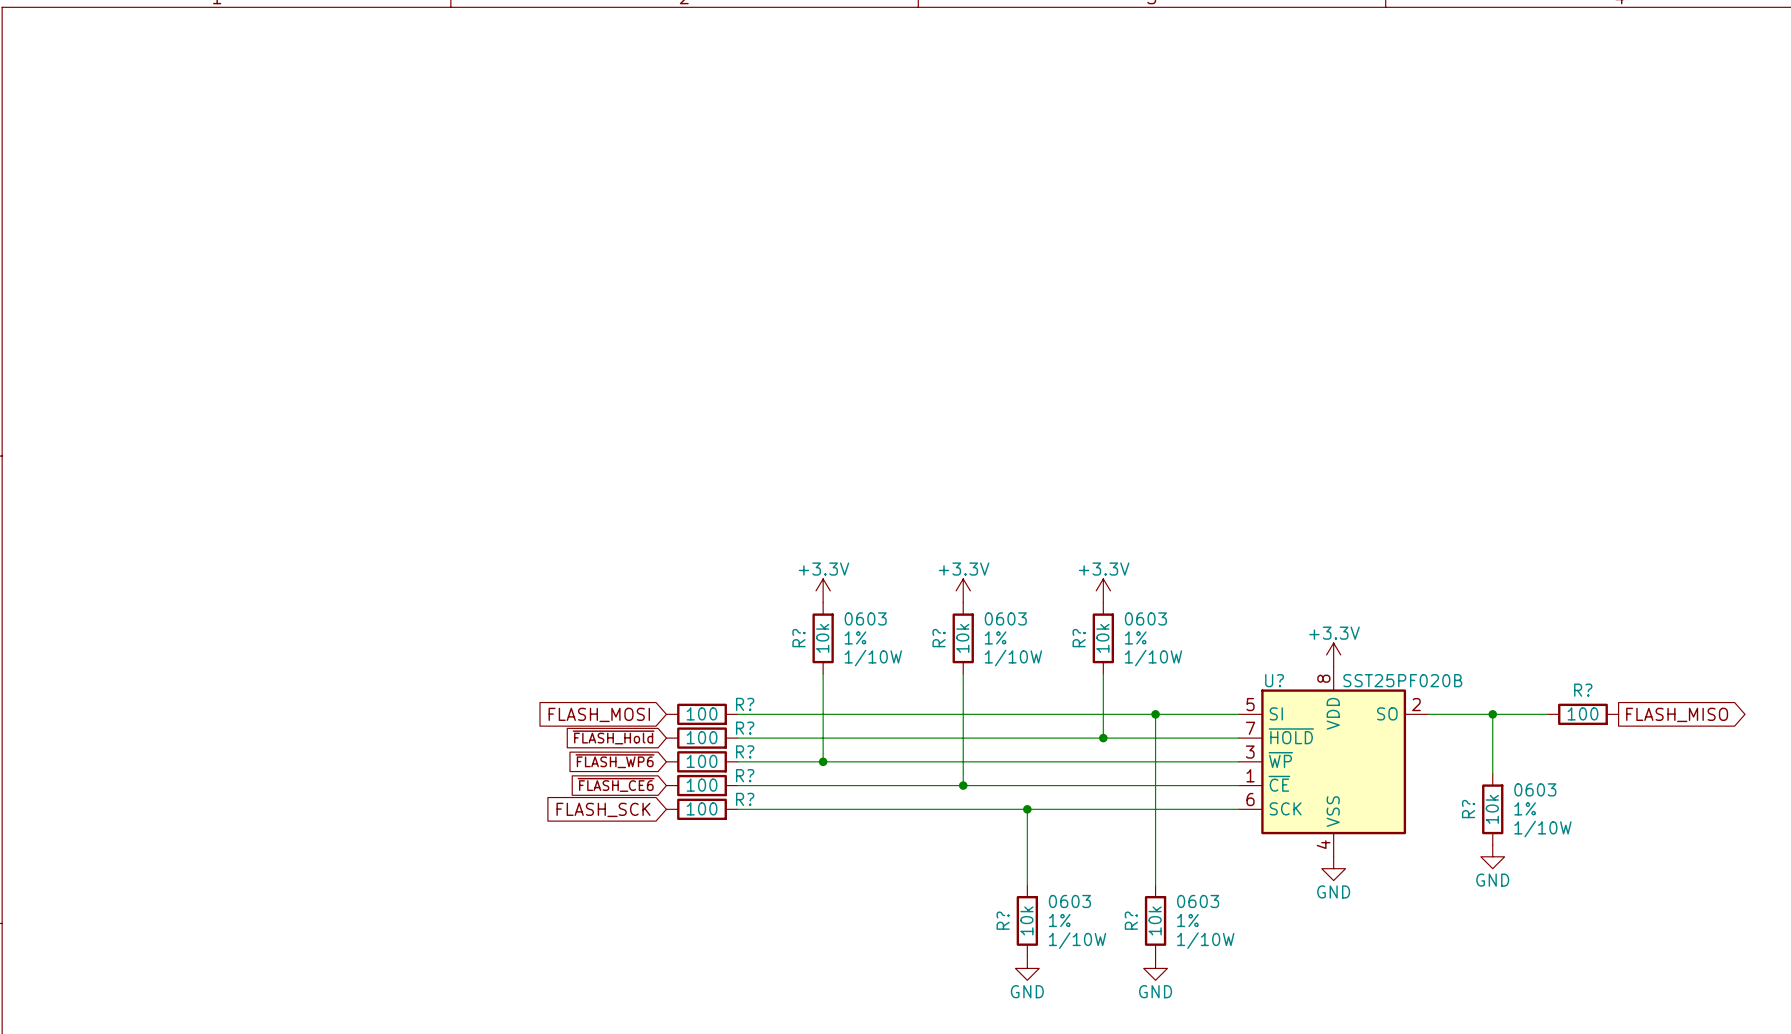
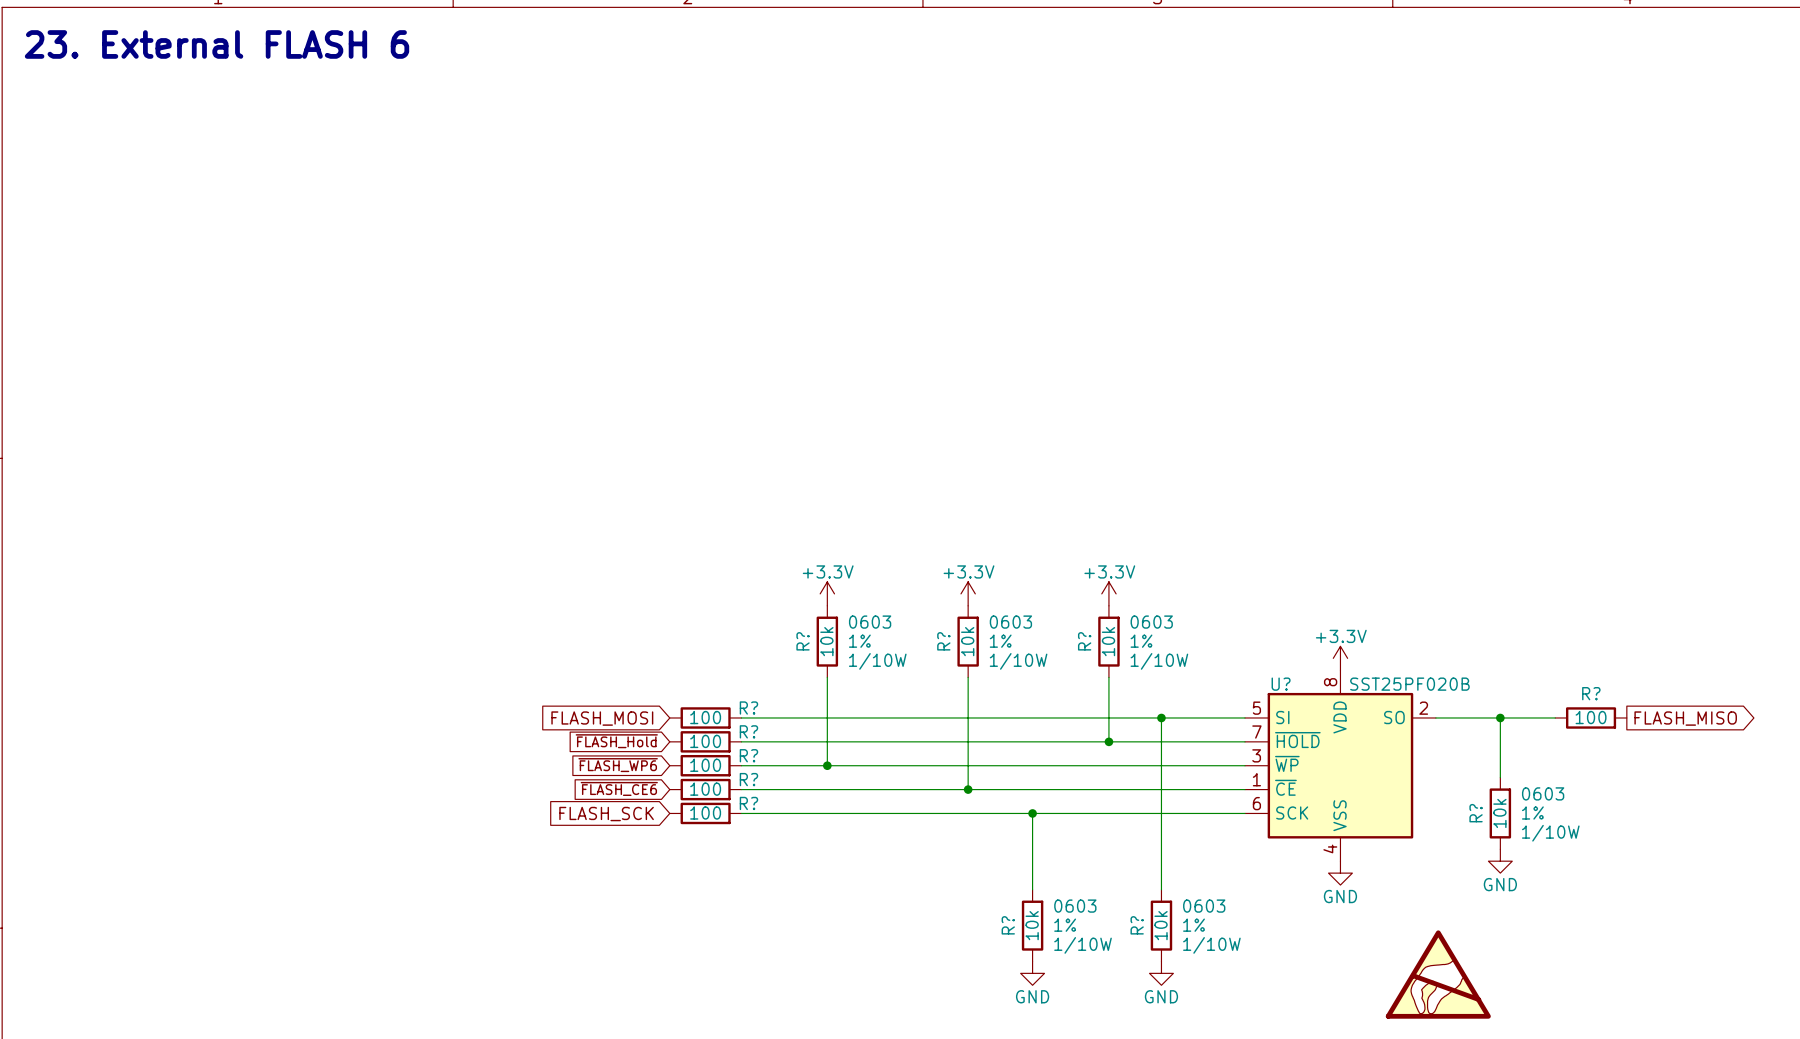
text: none -> 23. External FLASH 6 (217, 44)
power symbol: none -> (1438, 974)

